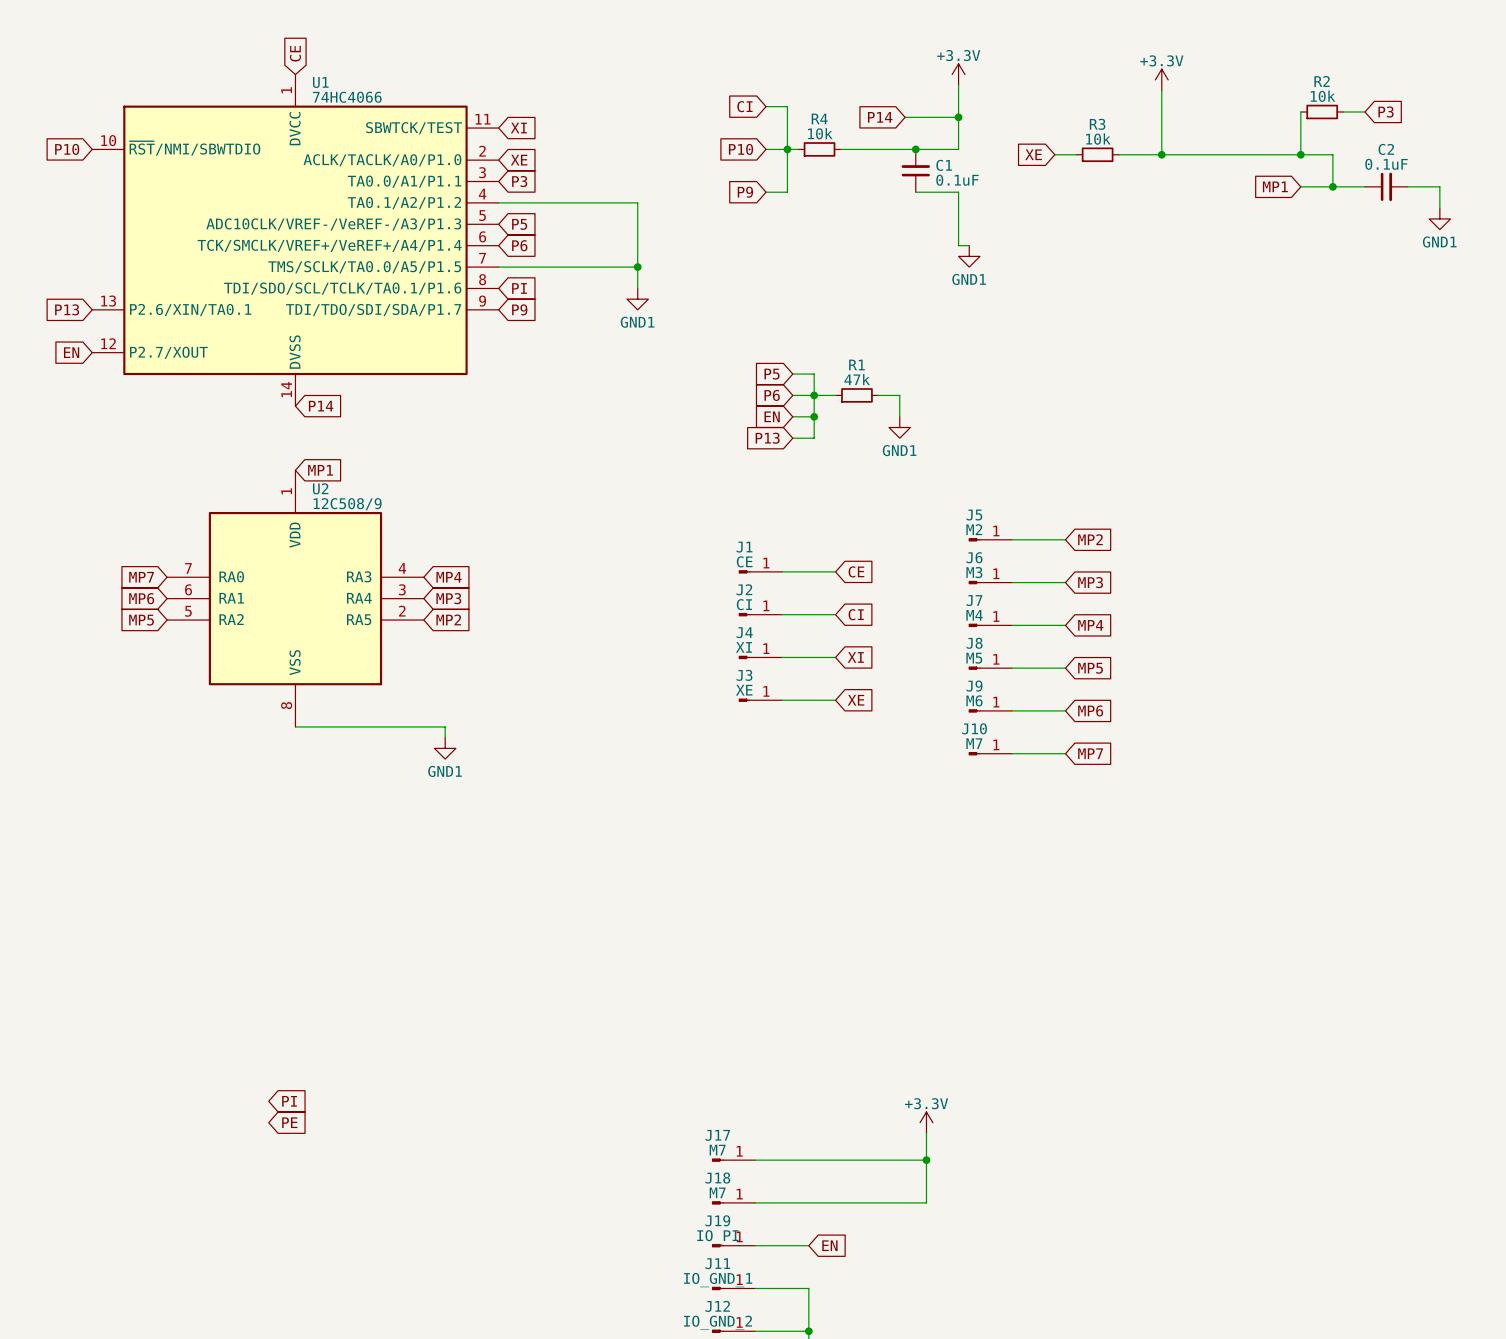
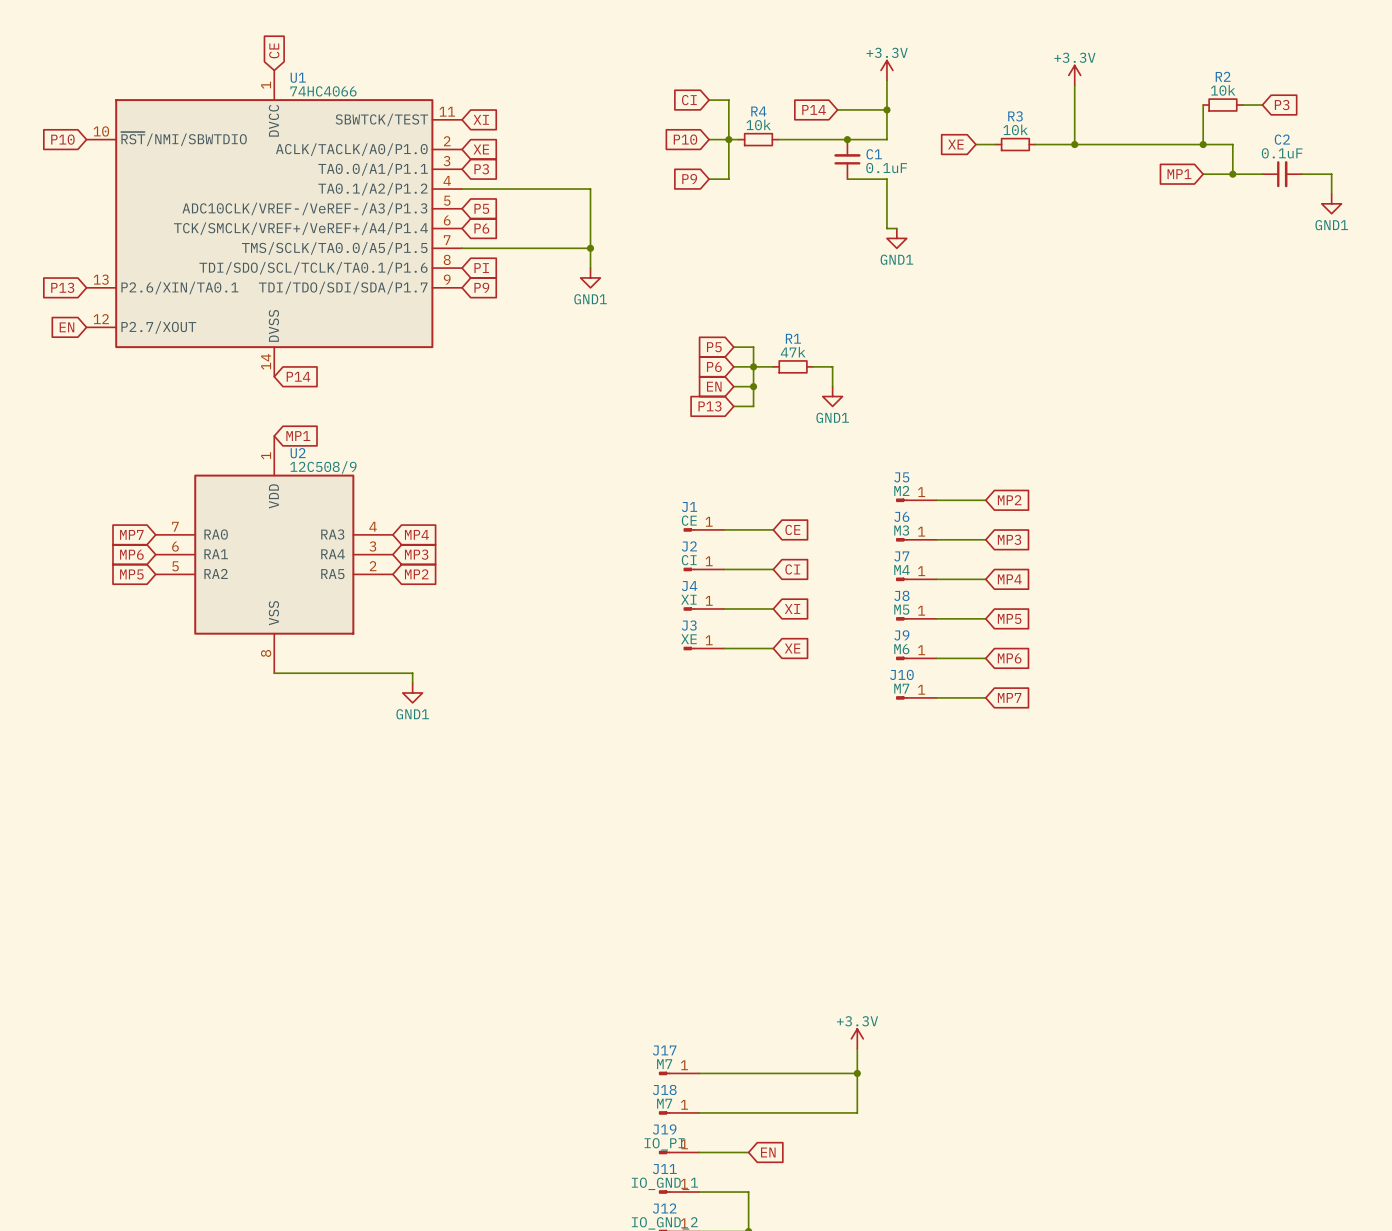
global label: PI (289, 1101) -> none
global label: PE (289, 1122) -> none

